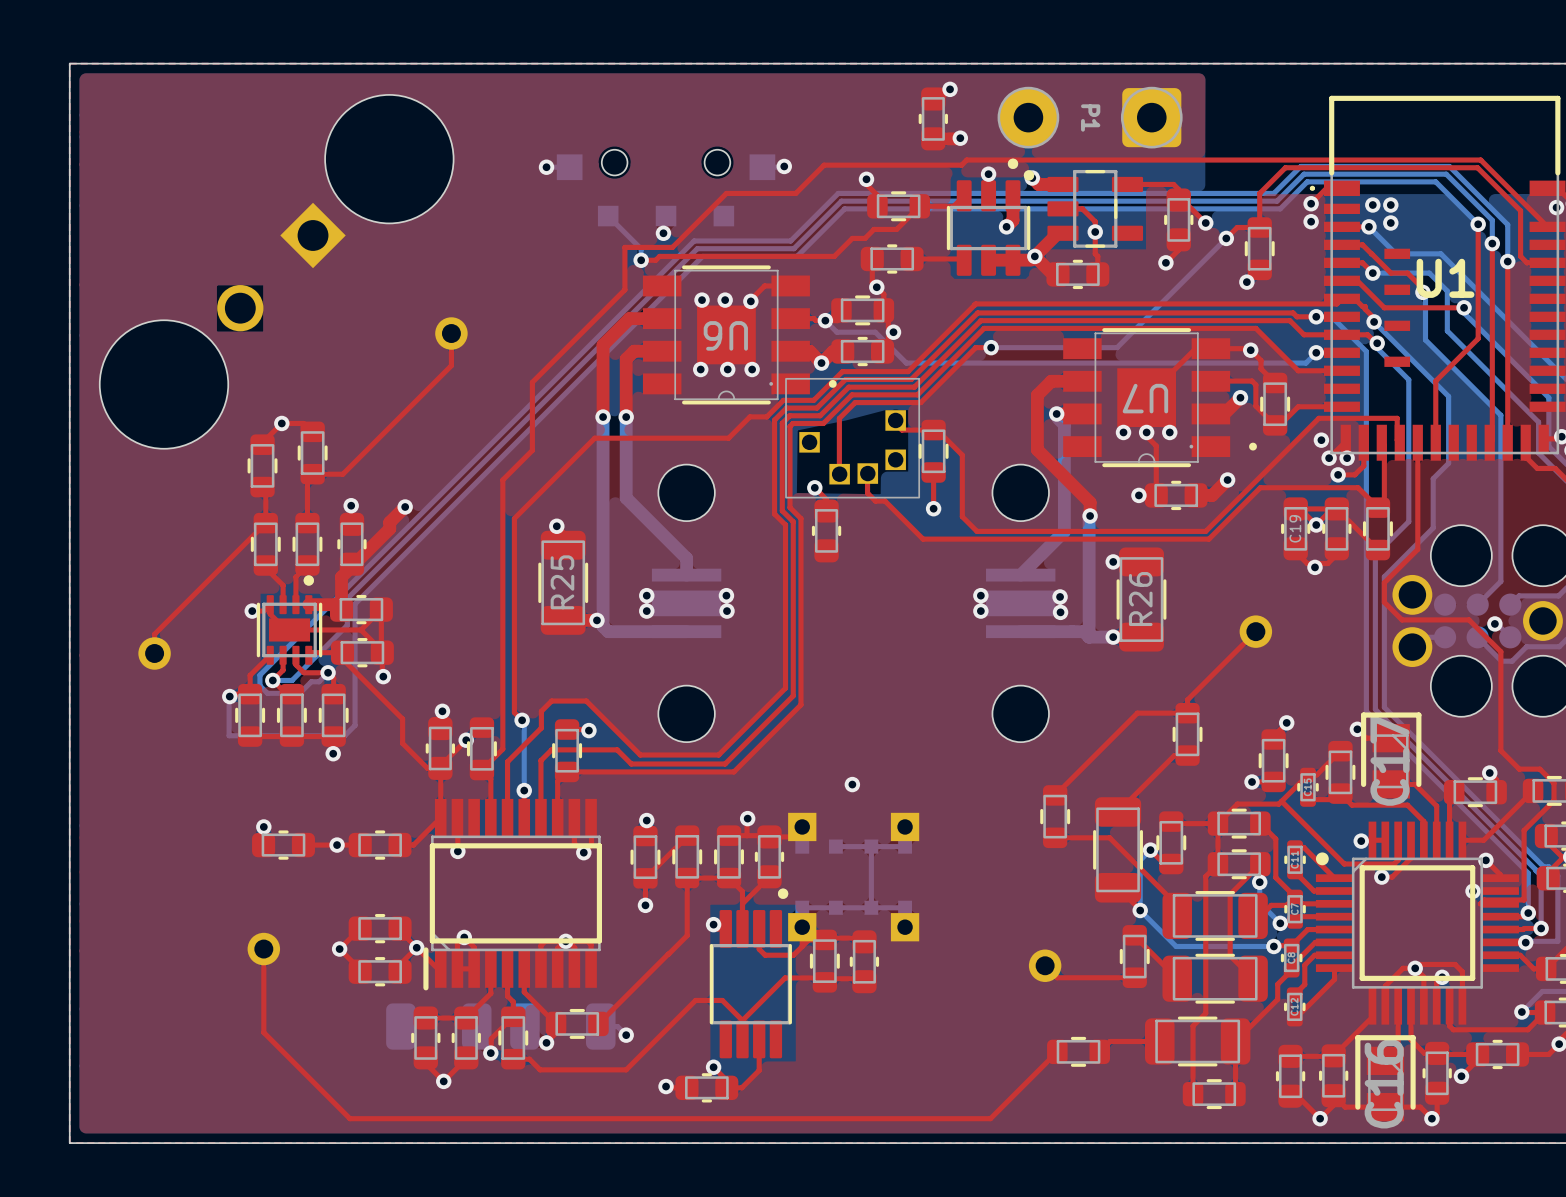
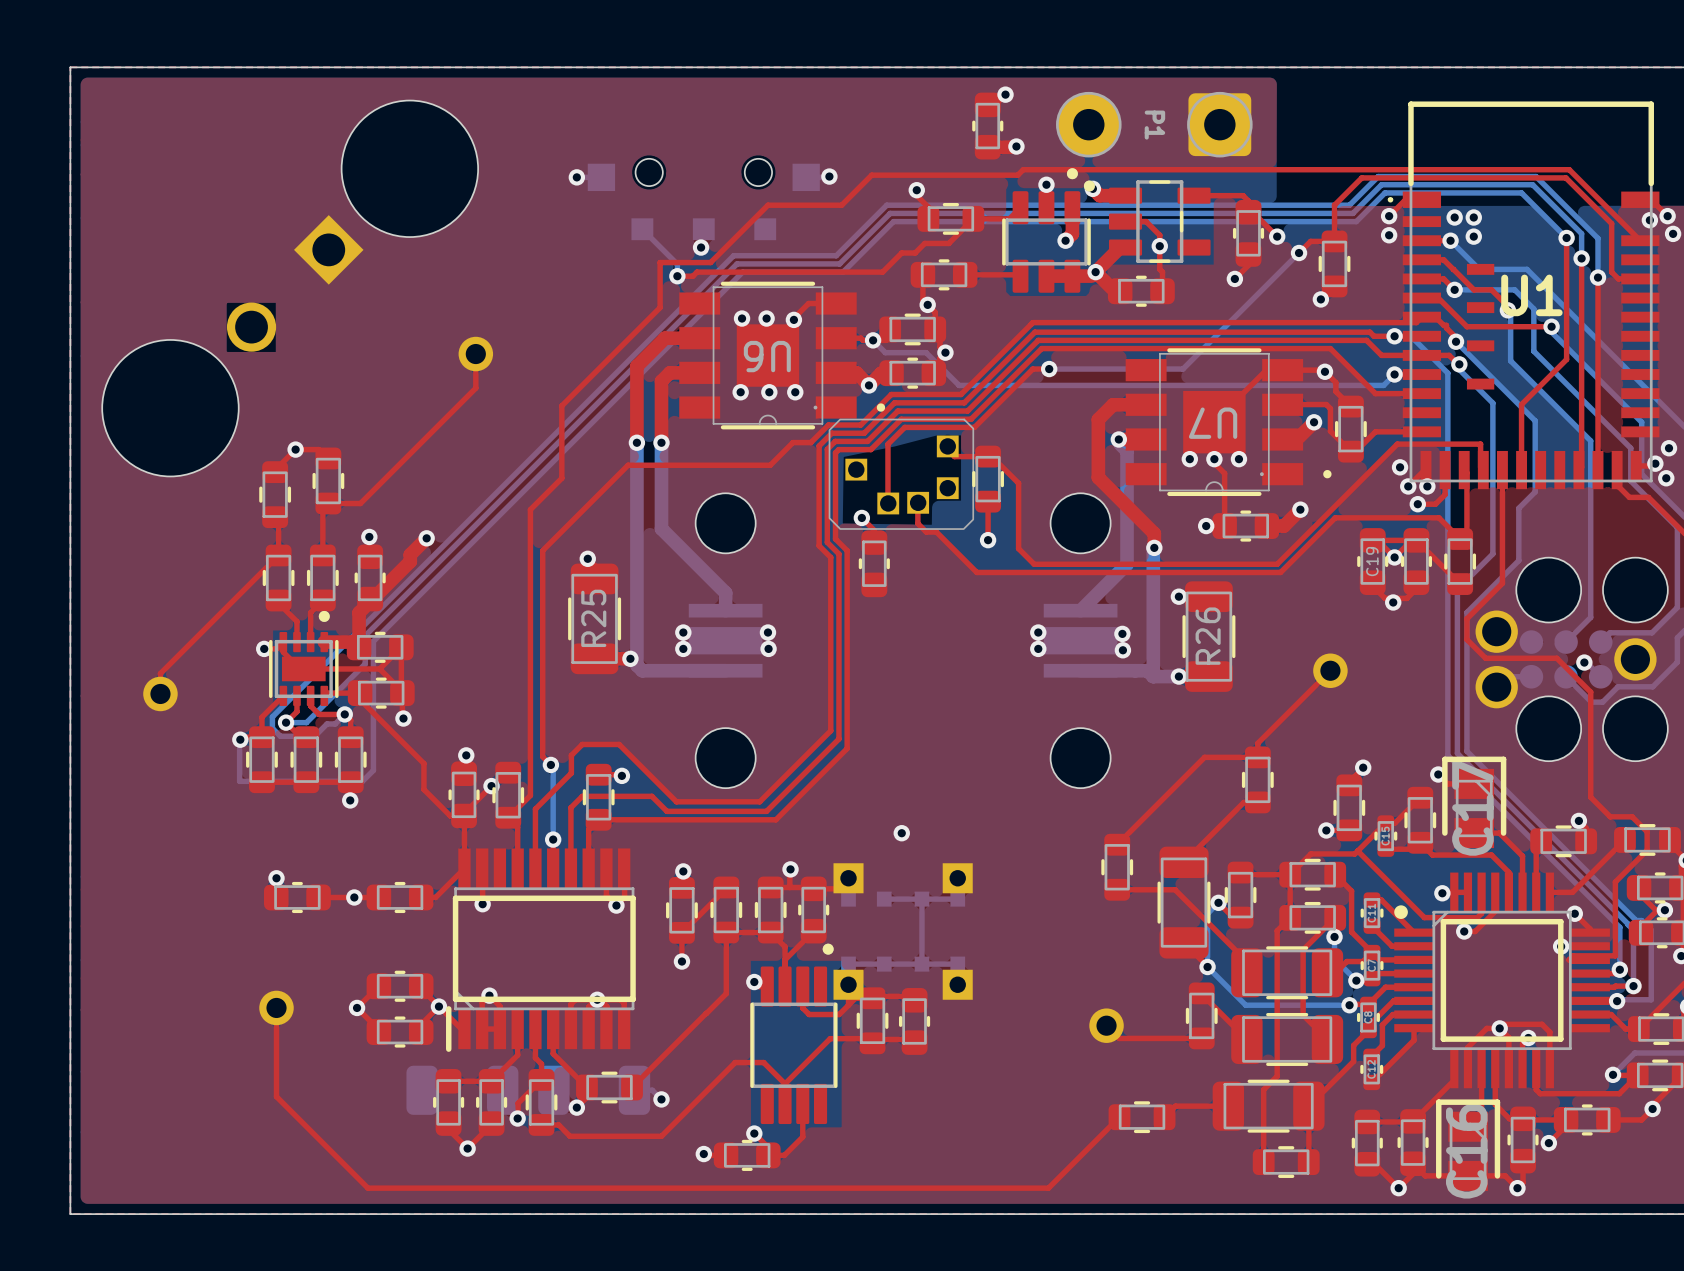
part footprint: [785, 378, 920, 499] -> [828, 418, 974, 530]

